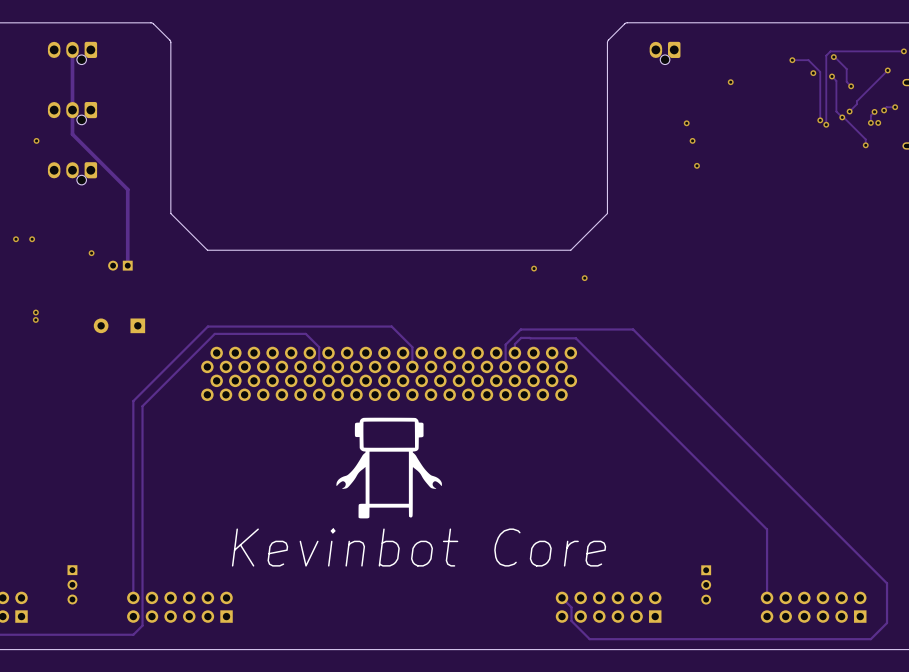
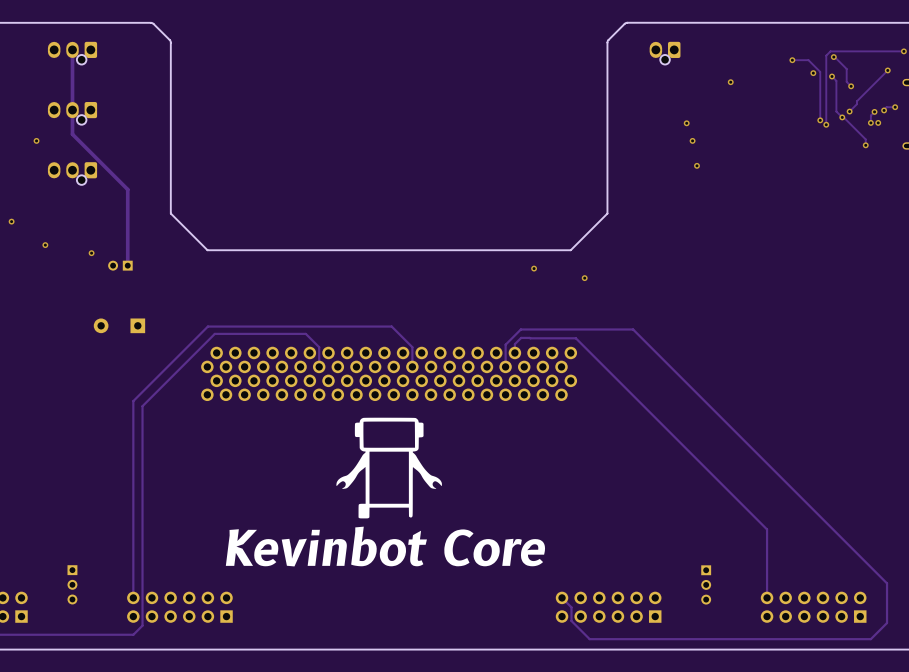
via: none -> (11, 221)
via: (16, 239) -> none
via: (32, 239) -> none
via: none -> (45, 245)
via: (35, 312) -> none
via: (35, 319) -> none

